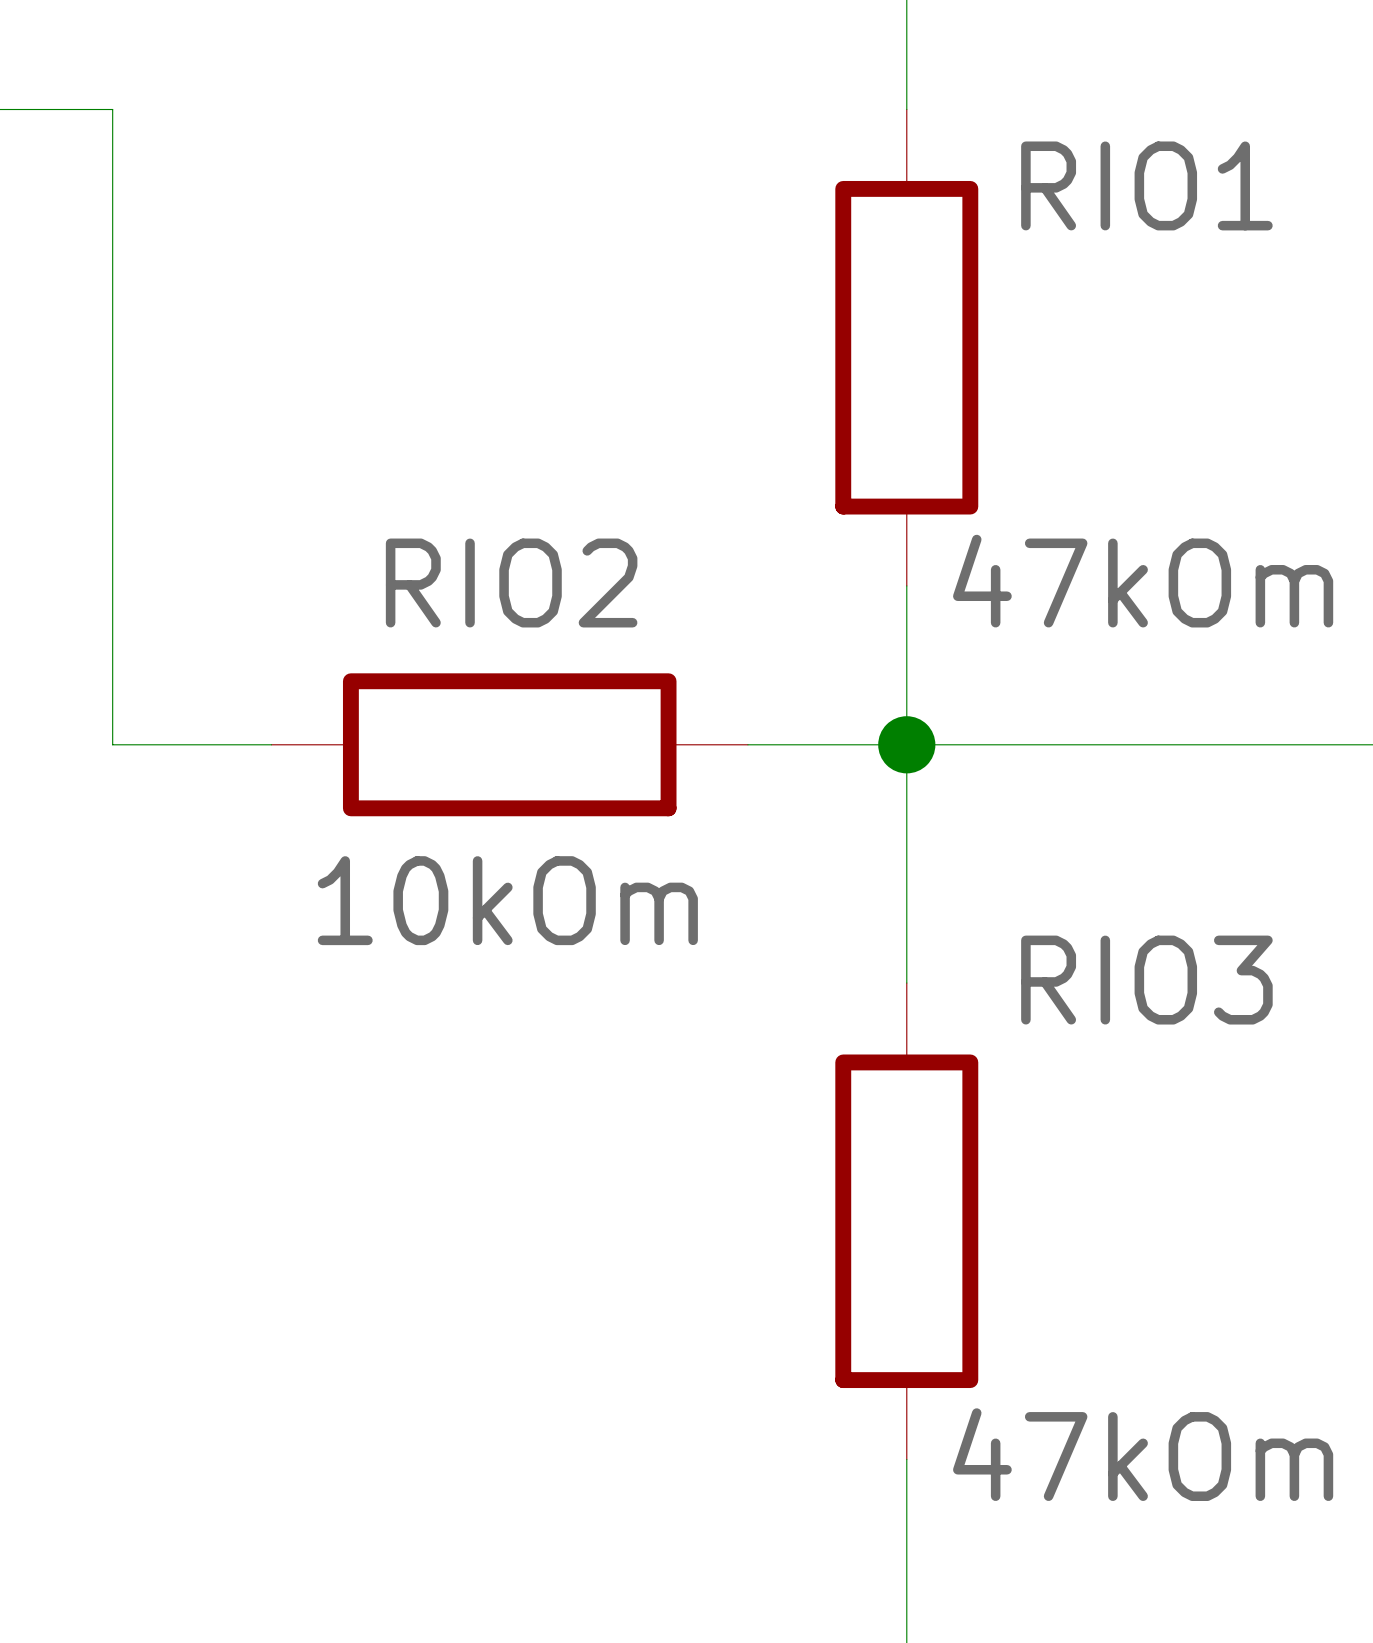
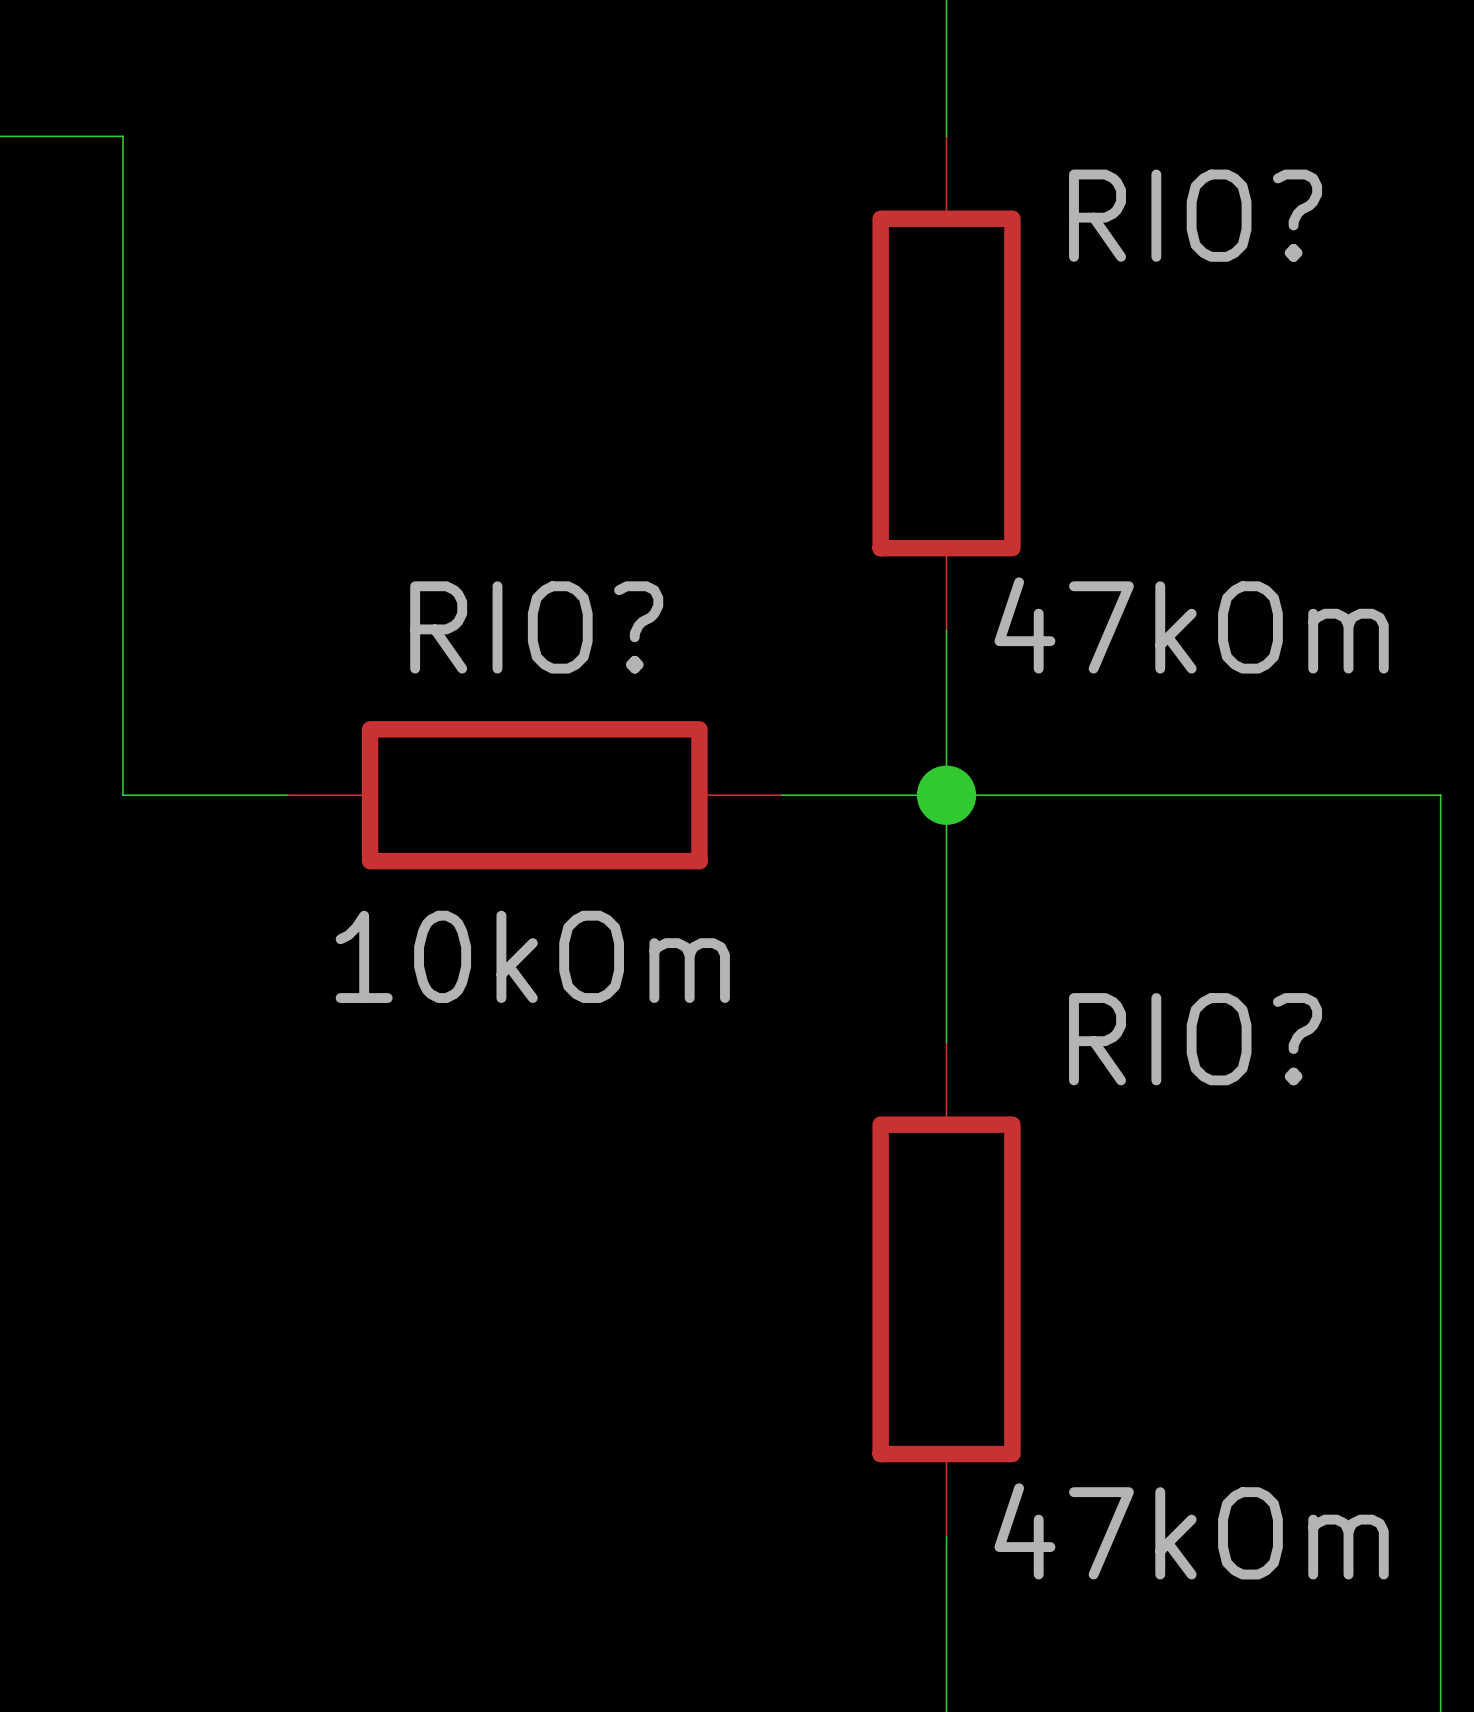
RIO1 name: RIO1 (1146, 185) -> RIO? (1195, 215)
RIO2 name: RIO2 (511, 583) -> RIO? (536, 627)
RIO3 name: RIO3 (1146, 980) -> RIO? (1195, 1039)

